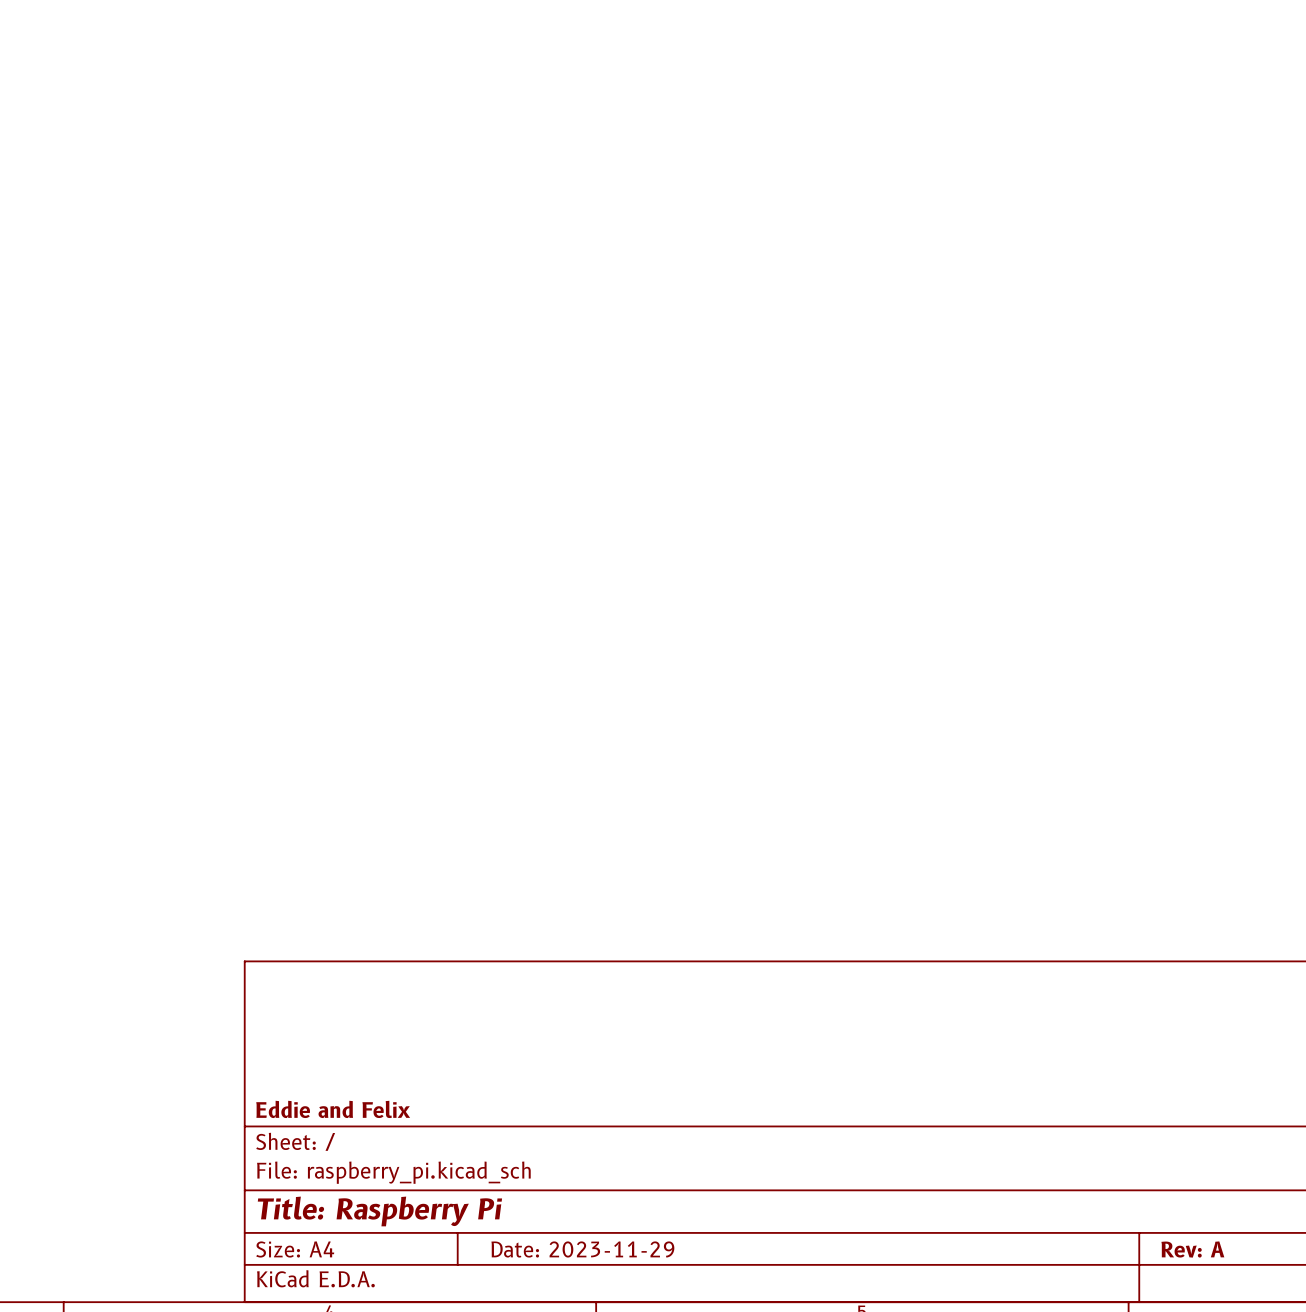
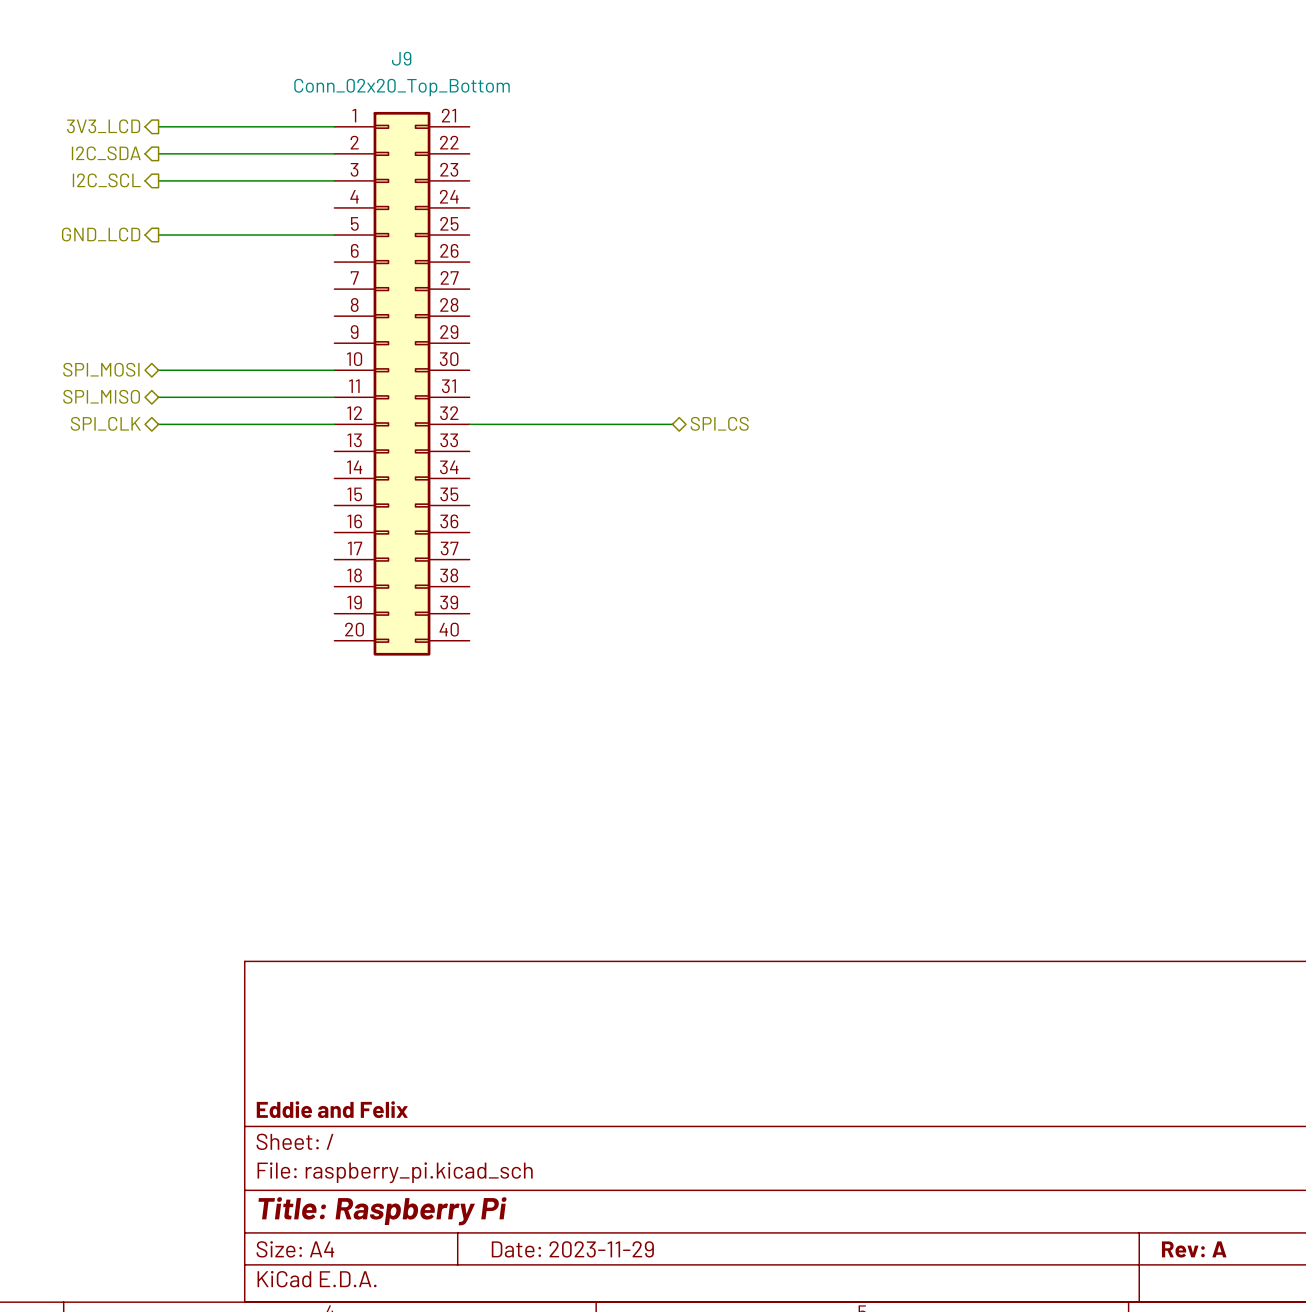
wire: none -> (158, 126) (334, 126)
hierarchical label: none -> 3V3_LCD (103, 126)
wire: none -> (158, 153) (334, 153)
hierarchical label: none -> I2C_SDA (106, 153)
wire: none -> (158, 180) (334, 180)
hierarchical label: none -> I2C_SCL (106, 180)
wire: none -> (158, 235) (334, 235)
hierarchical label: none -> GND_LCD (101, 234)
wire: none -> (158, 370) (334, 370)
hierarchical label: none -> SPI_MOSI (101, 369)
J9: none -> Conn_02x20_Top_Bottom (402, 383)
wire: none -> (158, 397) (334, 397)
hierarchical label: none -> SPI_MISO (101, 396)
wire: none -> (158, 424) (334, 424)
wire: none -> (469, 424) (672, 424)
hierarchical label: none -> SPI_CLK (105, 423)
hierarchical label: none -> SPI_CS (719, 423)

